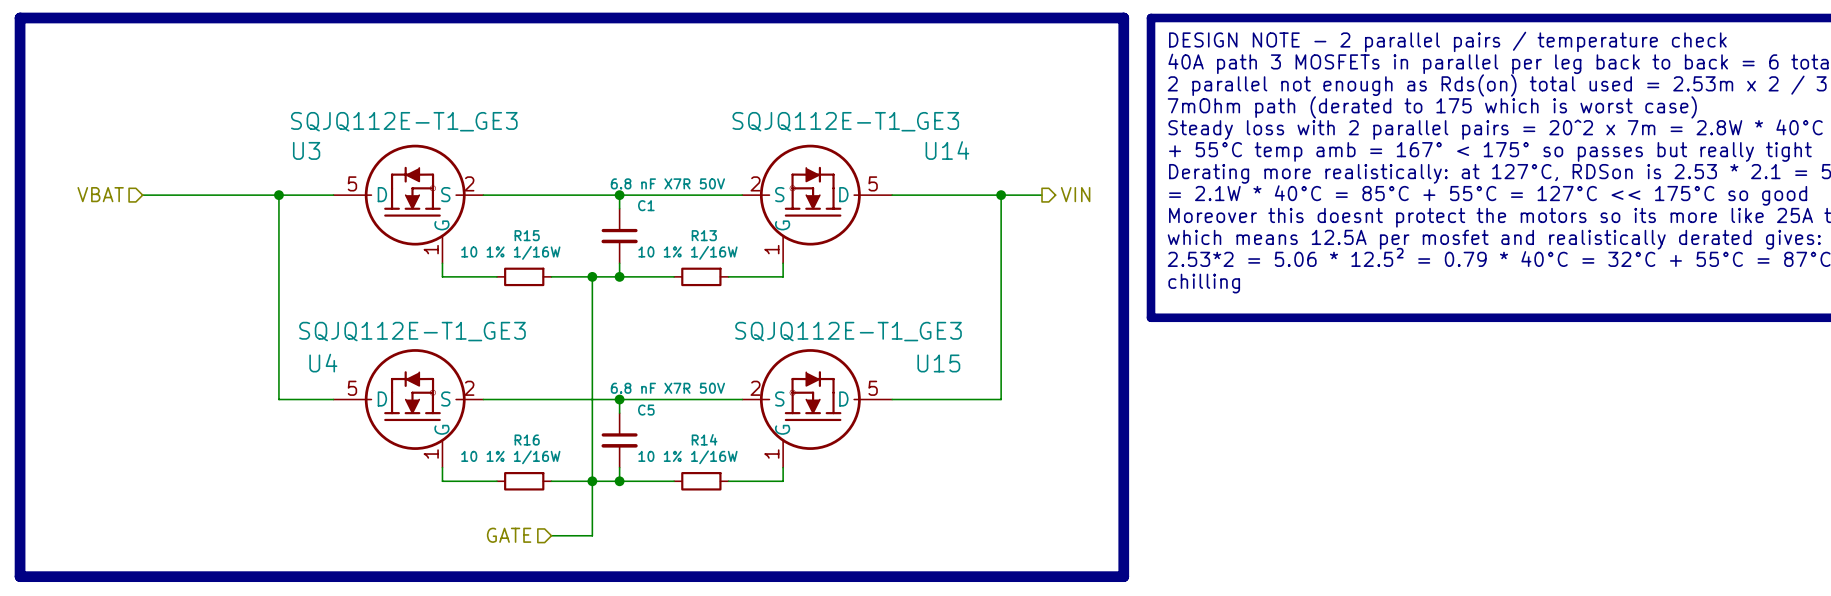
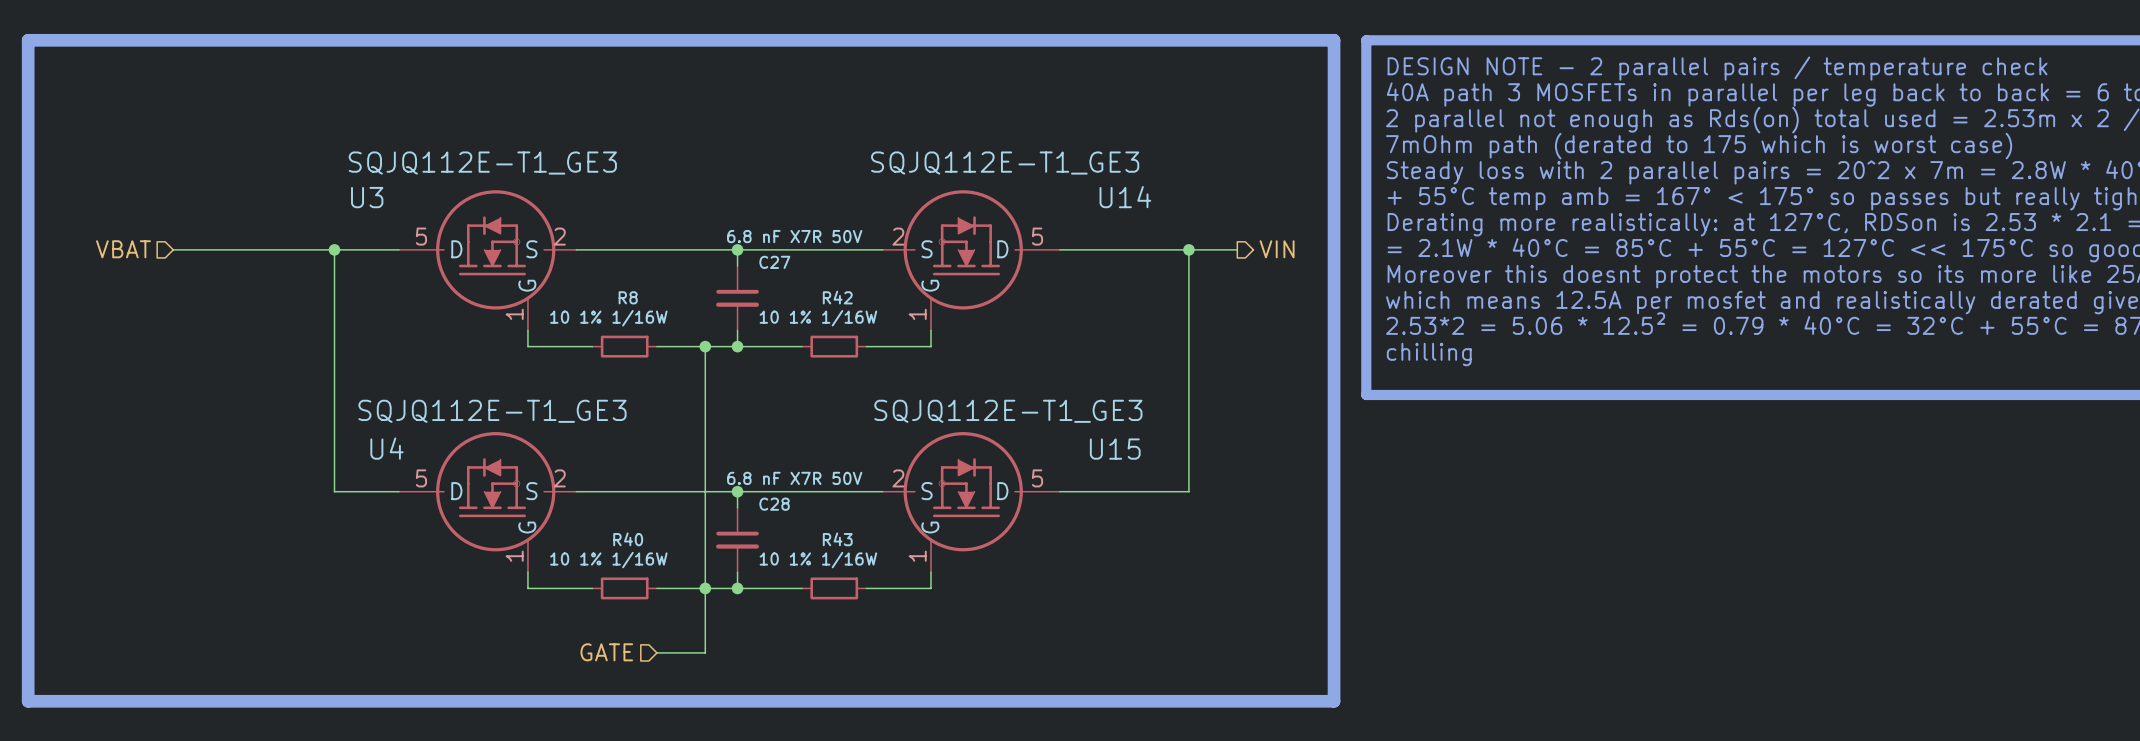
C1 name: C1 (646, 205) -> C27 (774, 262)
R15 name: R15 (527, 235) -> R8 (628, 297)
R13 name: R13 (704, 235) -> R42 (837, 297)
C5 name: C5 (646, 410) -> C28 (774, 504)
R14 name: R14 (704, 439) -> R43 (837, 539)
R16 name: R16 (527, 440) -> R40 (628, 539)

